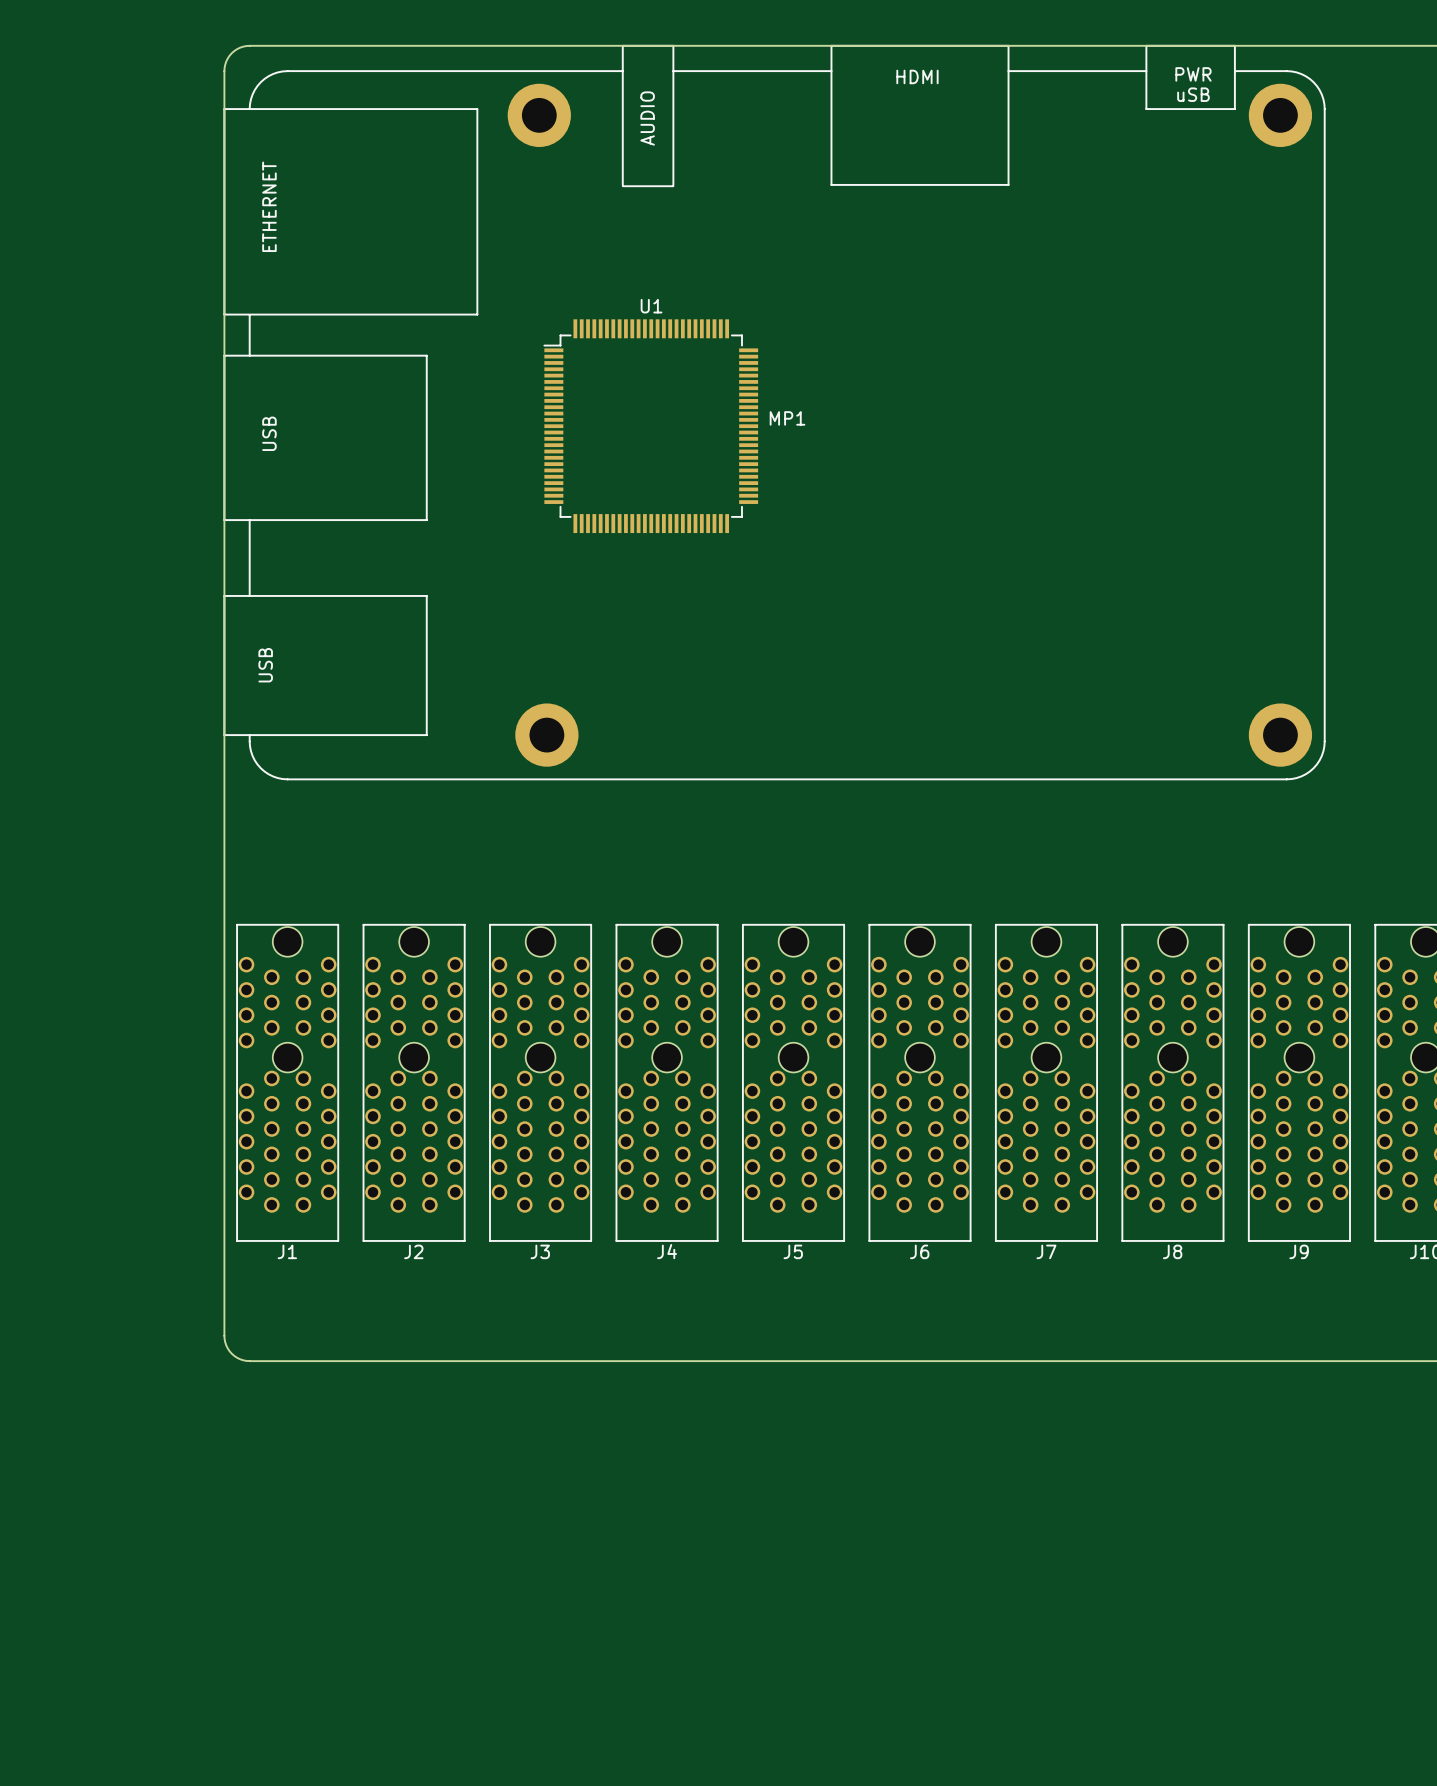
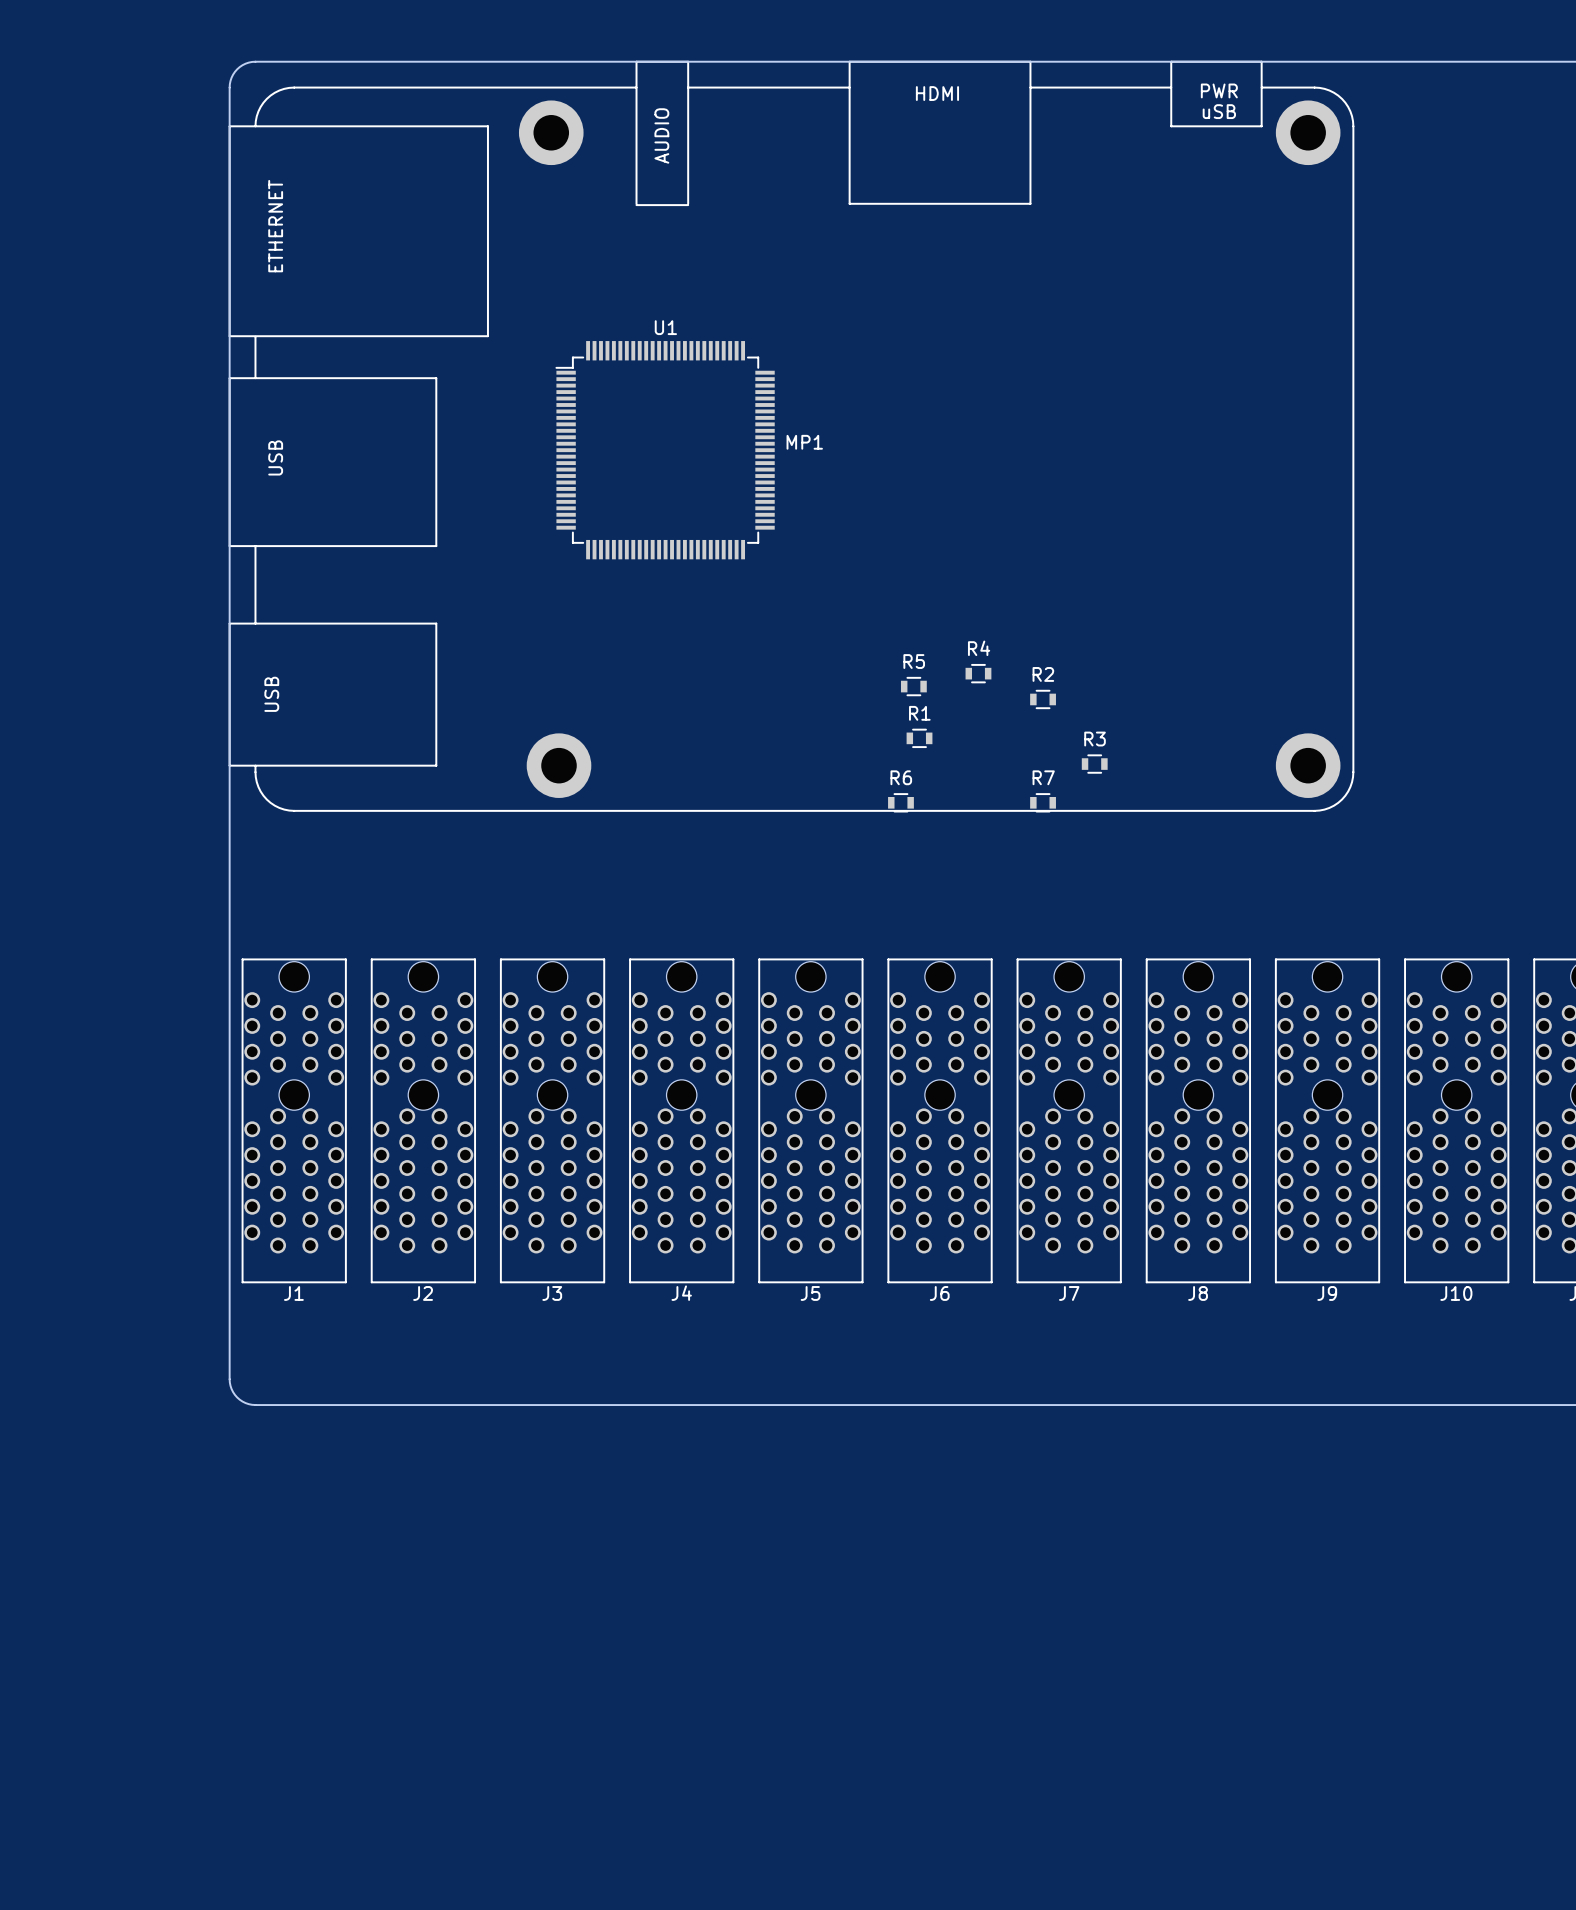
R4: none -> (978, 673)
R5: none -> (913, 686)
R2: none -> (1043, 699)
R1: none -> (919, 738)
R3: none -> (1094, 764)
R6: none -> (900, 802)
R7: none -> (1043, 802)

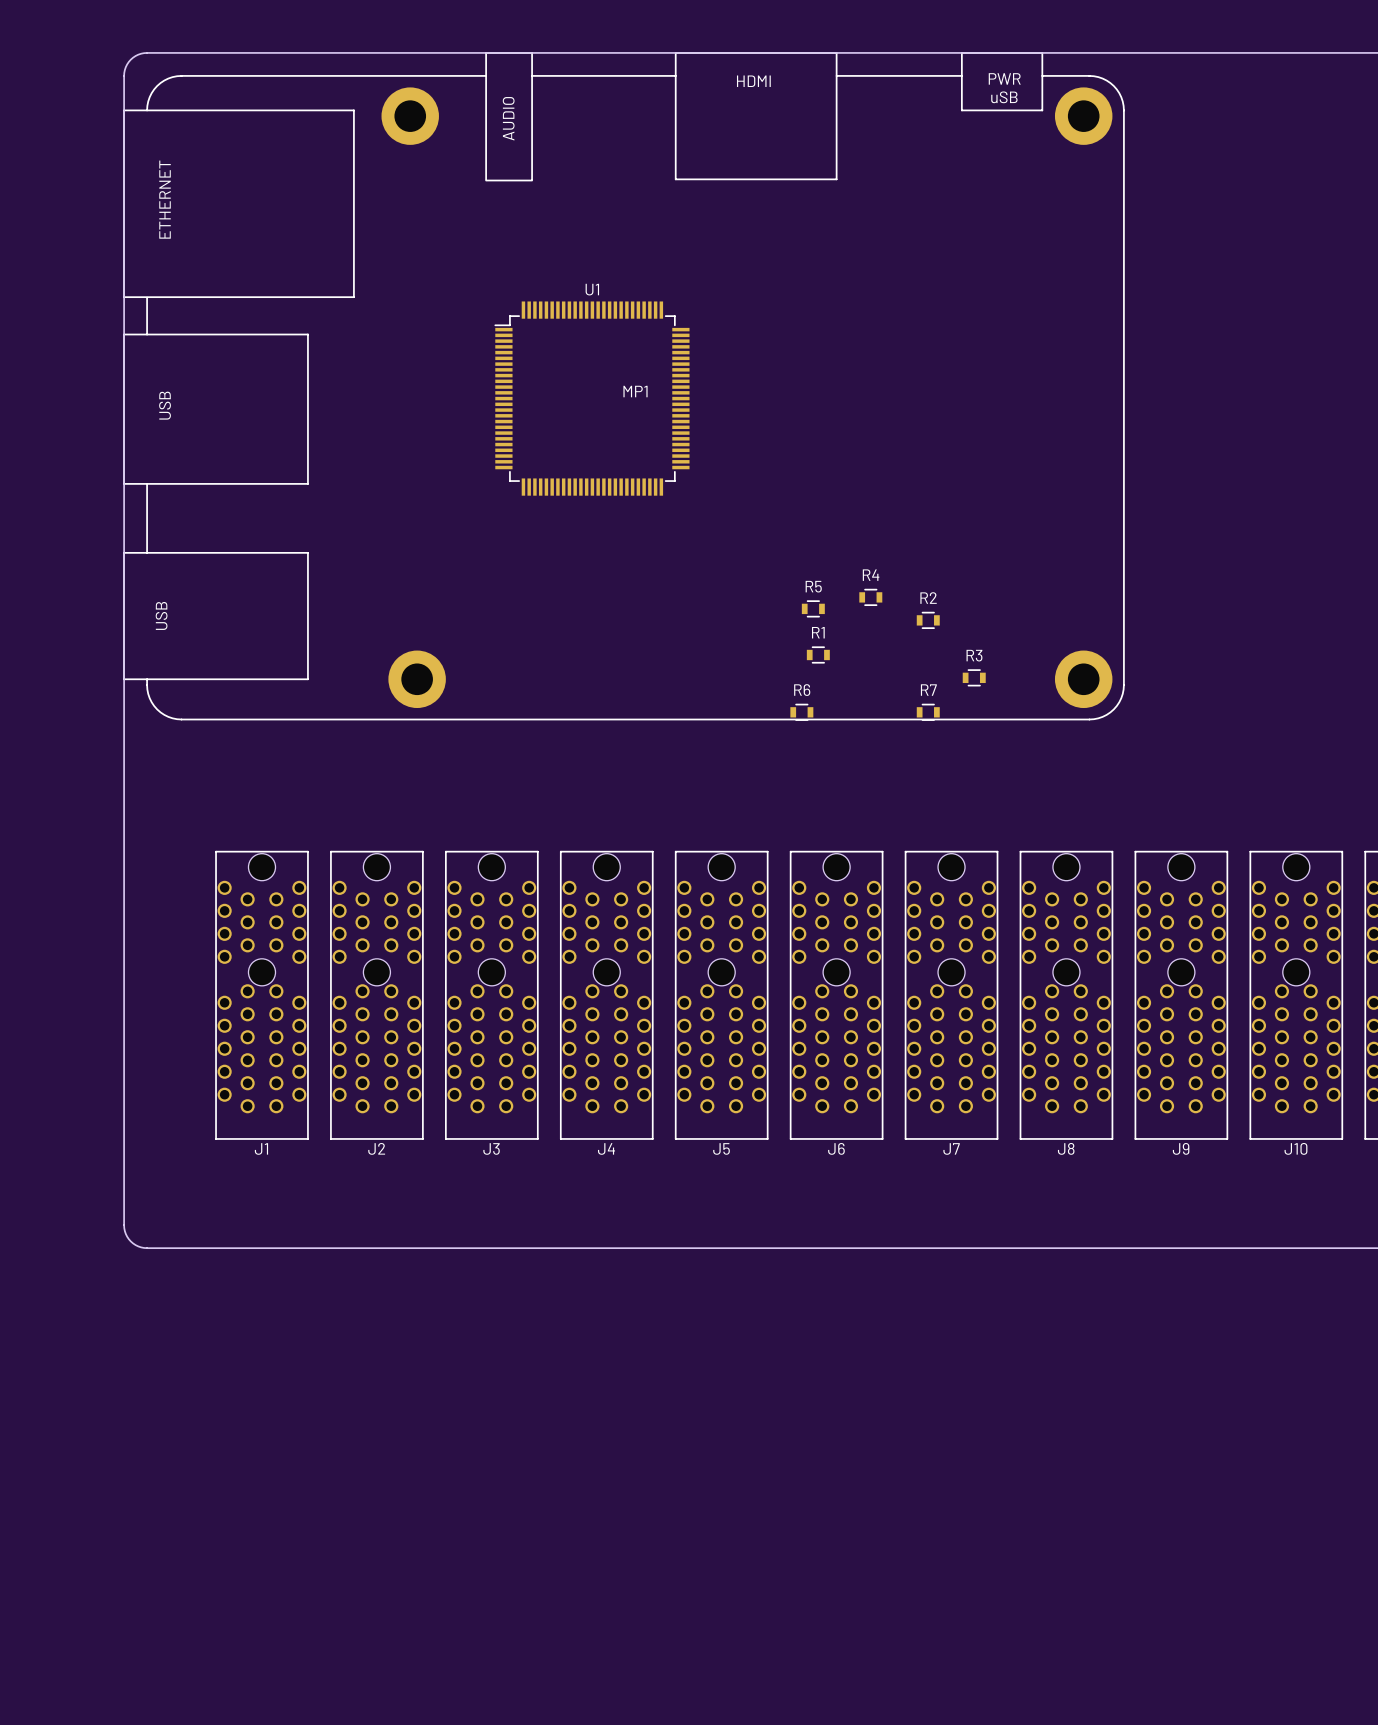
board edge: (255, 61) (245, 63) (237, 69) (231, 77) (229, 87) (229, 1379) (231, 1389) (237, 1397) (245, 1403) (255, 1405) -> (227, 52) (141, 53) (128, 61) (124, 75) (124, 1228) (130, 1241) (144, 1247) (227, 1248)
MP1 position: (791, 436) -> (624, 386)

